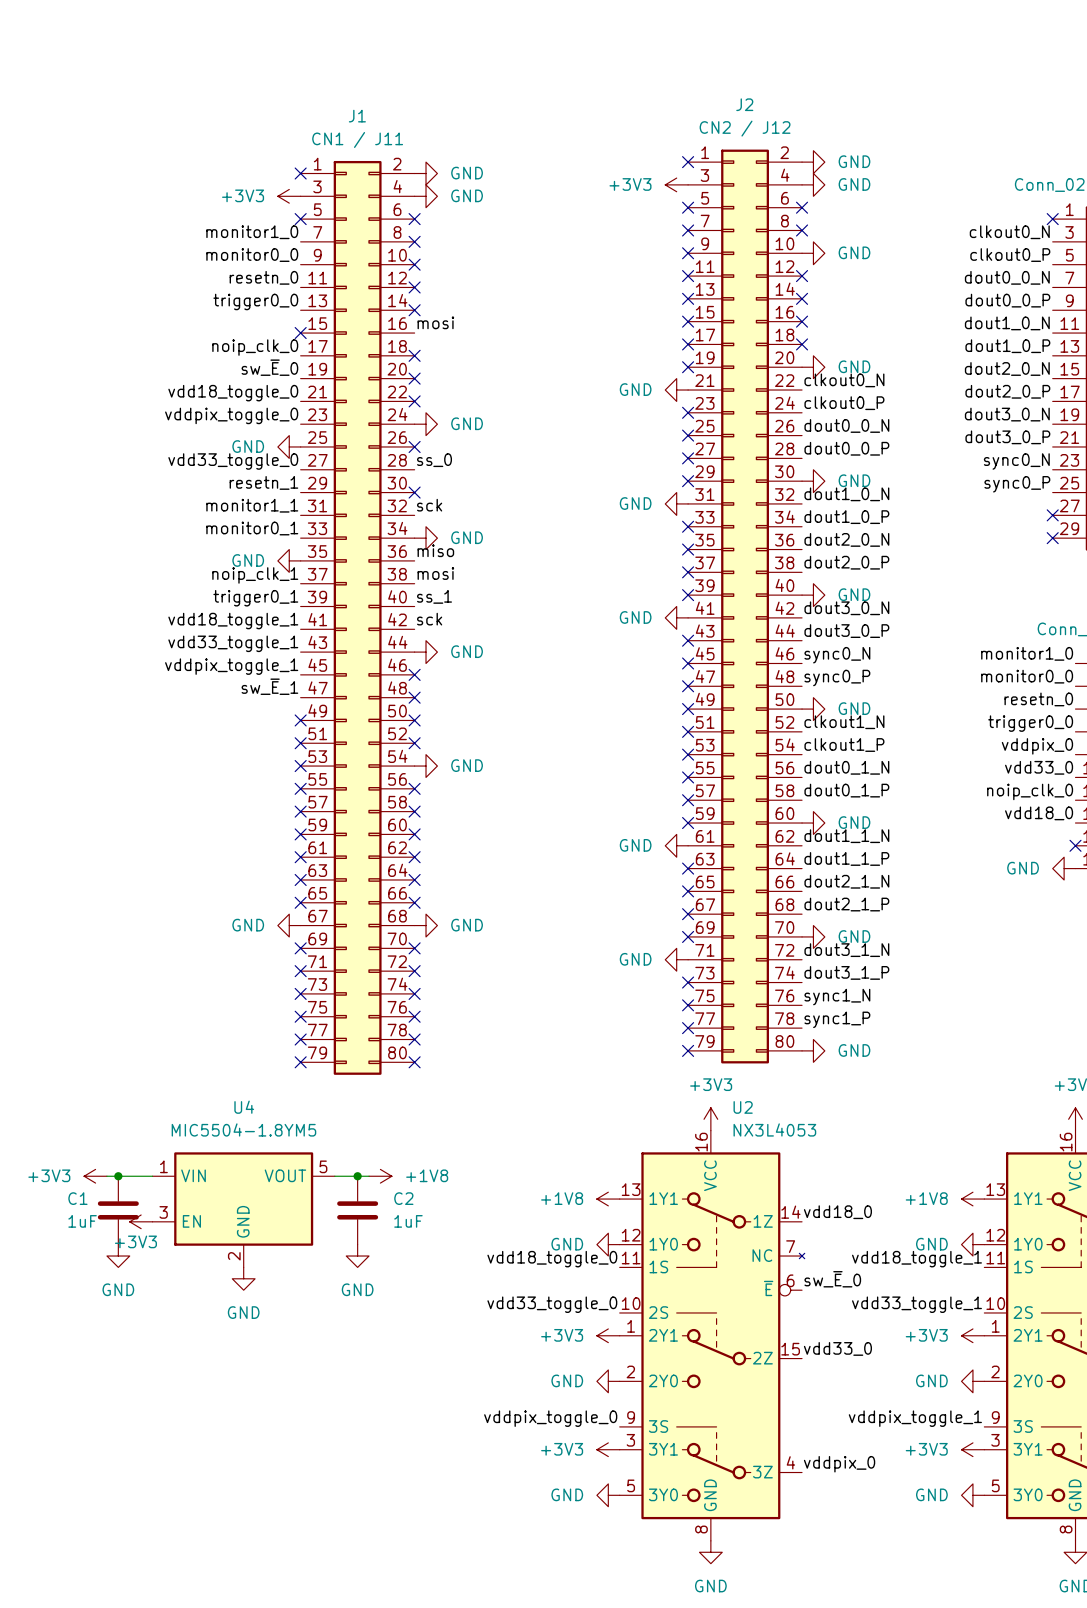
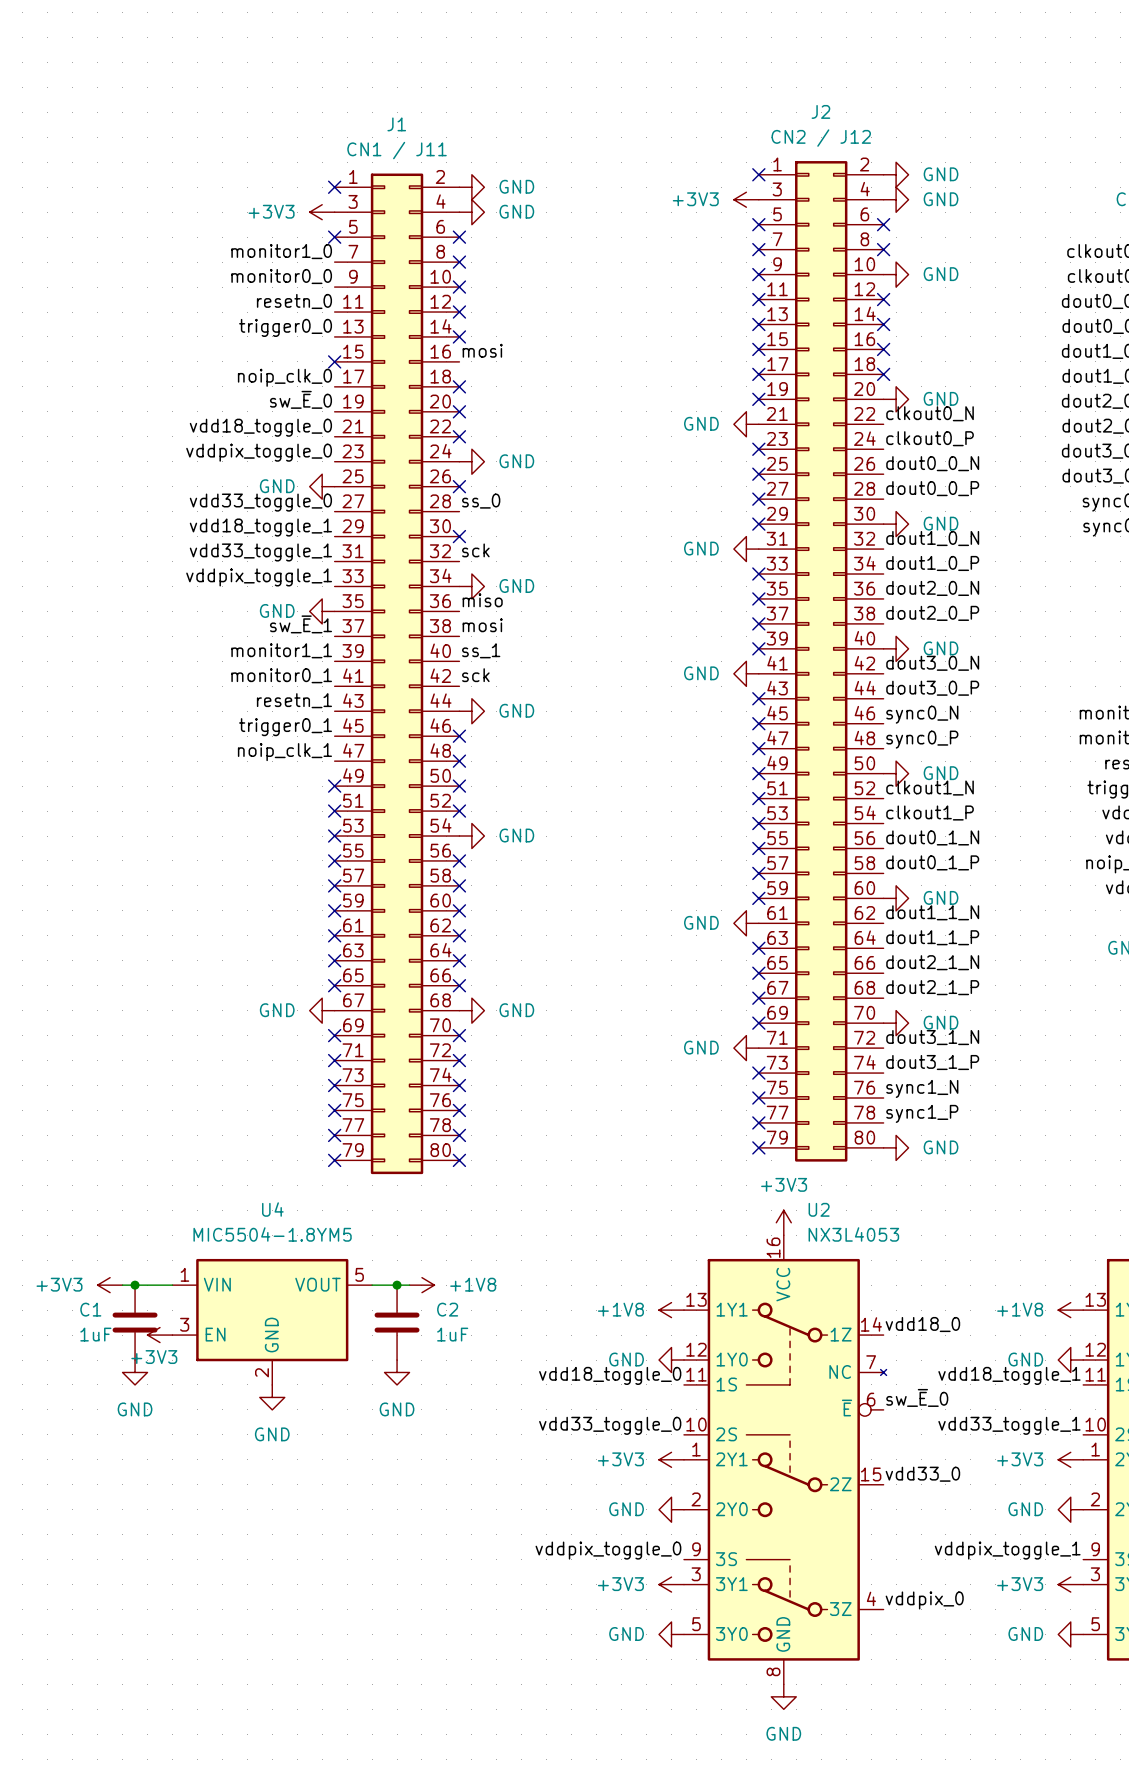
label: resetn_1 (263, 482) -> vdd18_toggle_1 (260, 527)
label: monitor1_1 (252, 505) -> vdd33_toggle_1 (260, 552)
label: monitor0_1 (252, 528) -> vddpix_toggle_1 (259, 577)
label: noip_clk_1 (255, 575) -> sw_~{E}_1 (300, 624)
label: trigger0_1 (255, 598) -> monitor1_1 (281, 650)
label: vdd18_toggle_1 (233, 621) -> monitor0_1 (281, 675)
label: vdd33_toggle_1 (233, 643) -> resetn_1 (294, 700)
label: vddpix_toggle_1 (231, 666) -> trigger0_1 (285, 727)
label: sw_~{E}_1 (269, 686) -> noip_clk_1 (284, 752)

